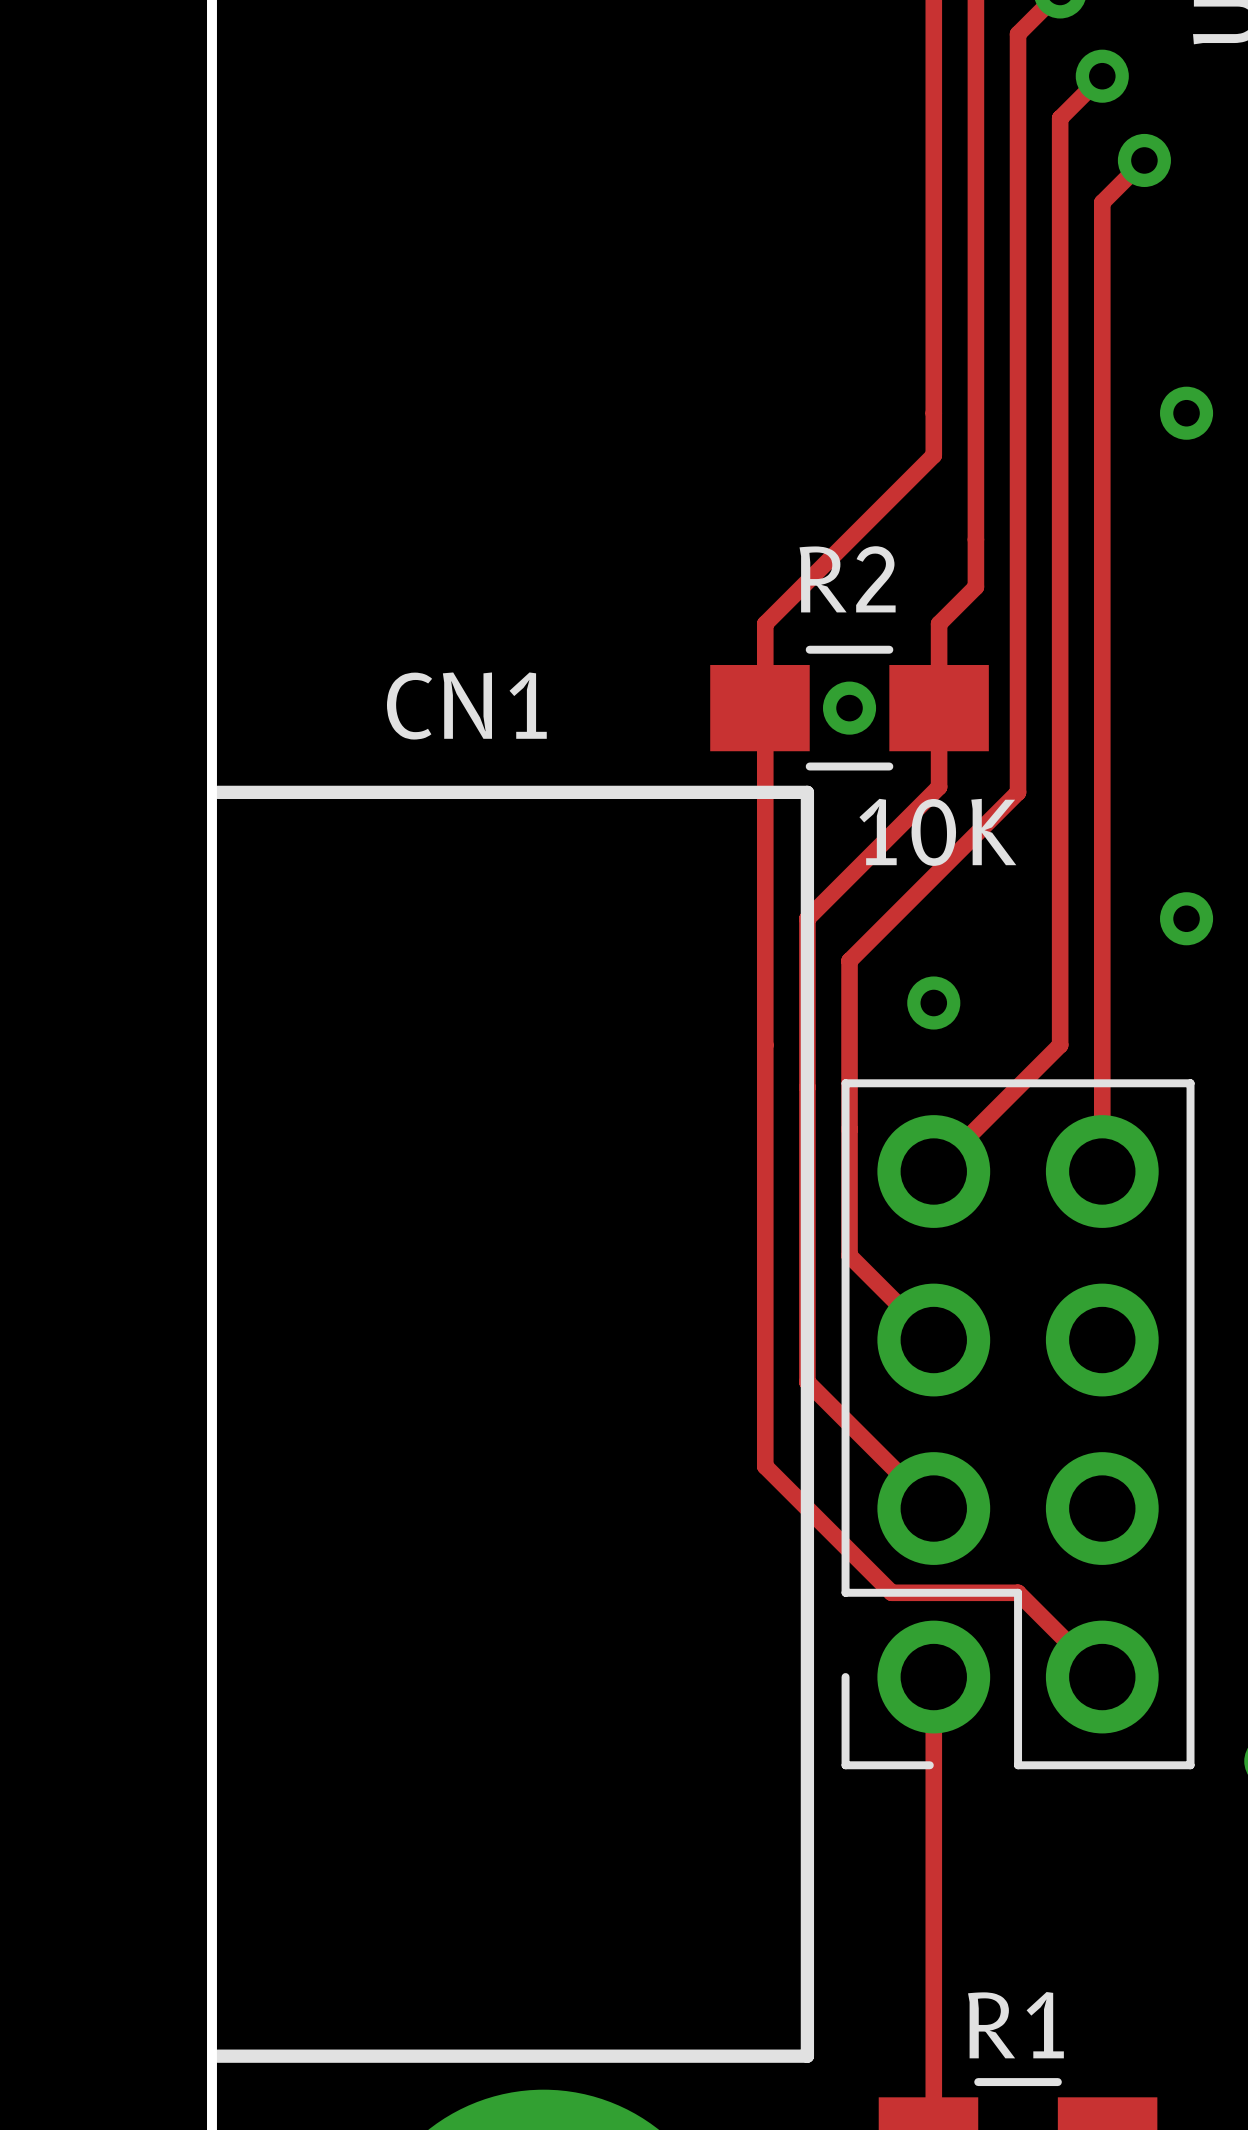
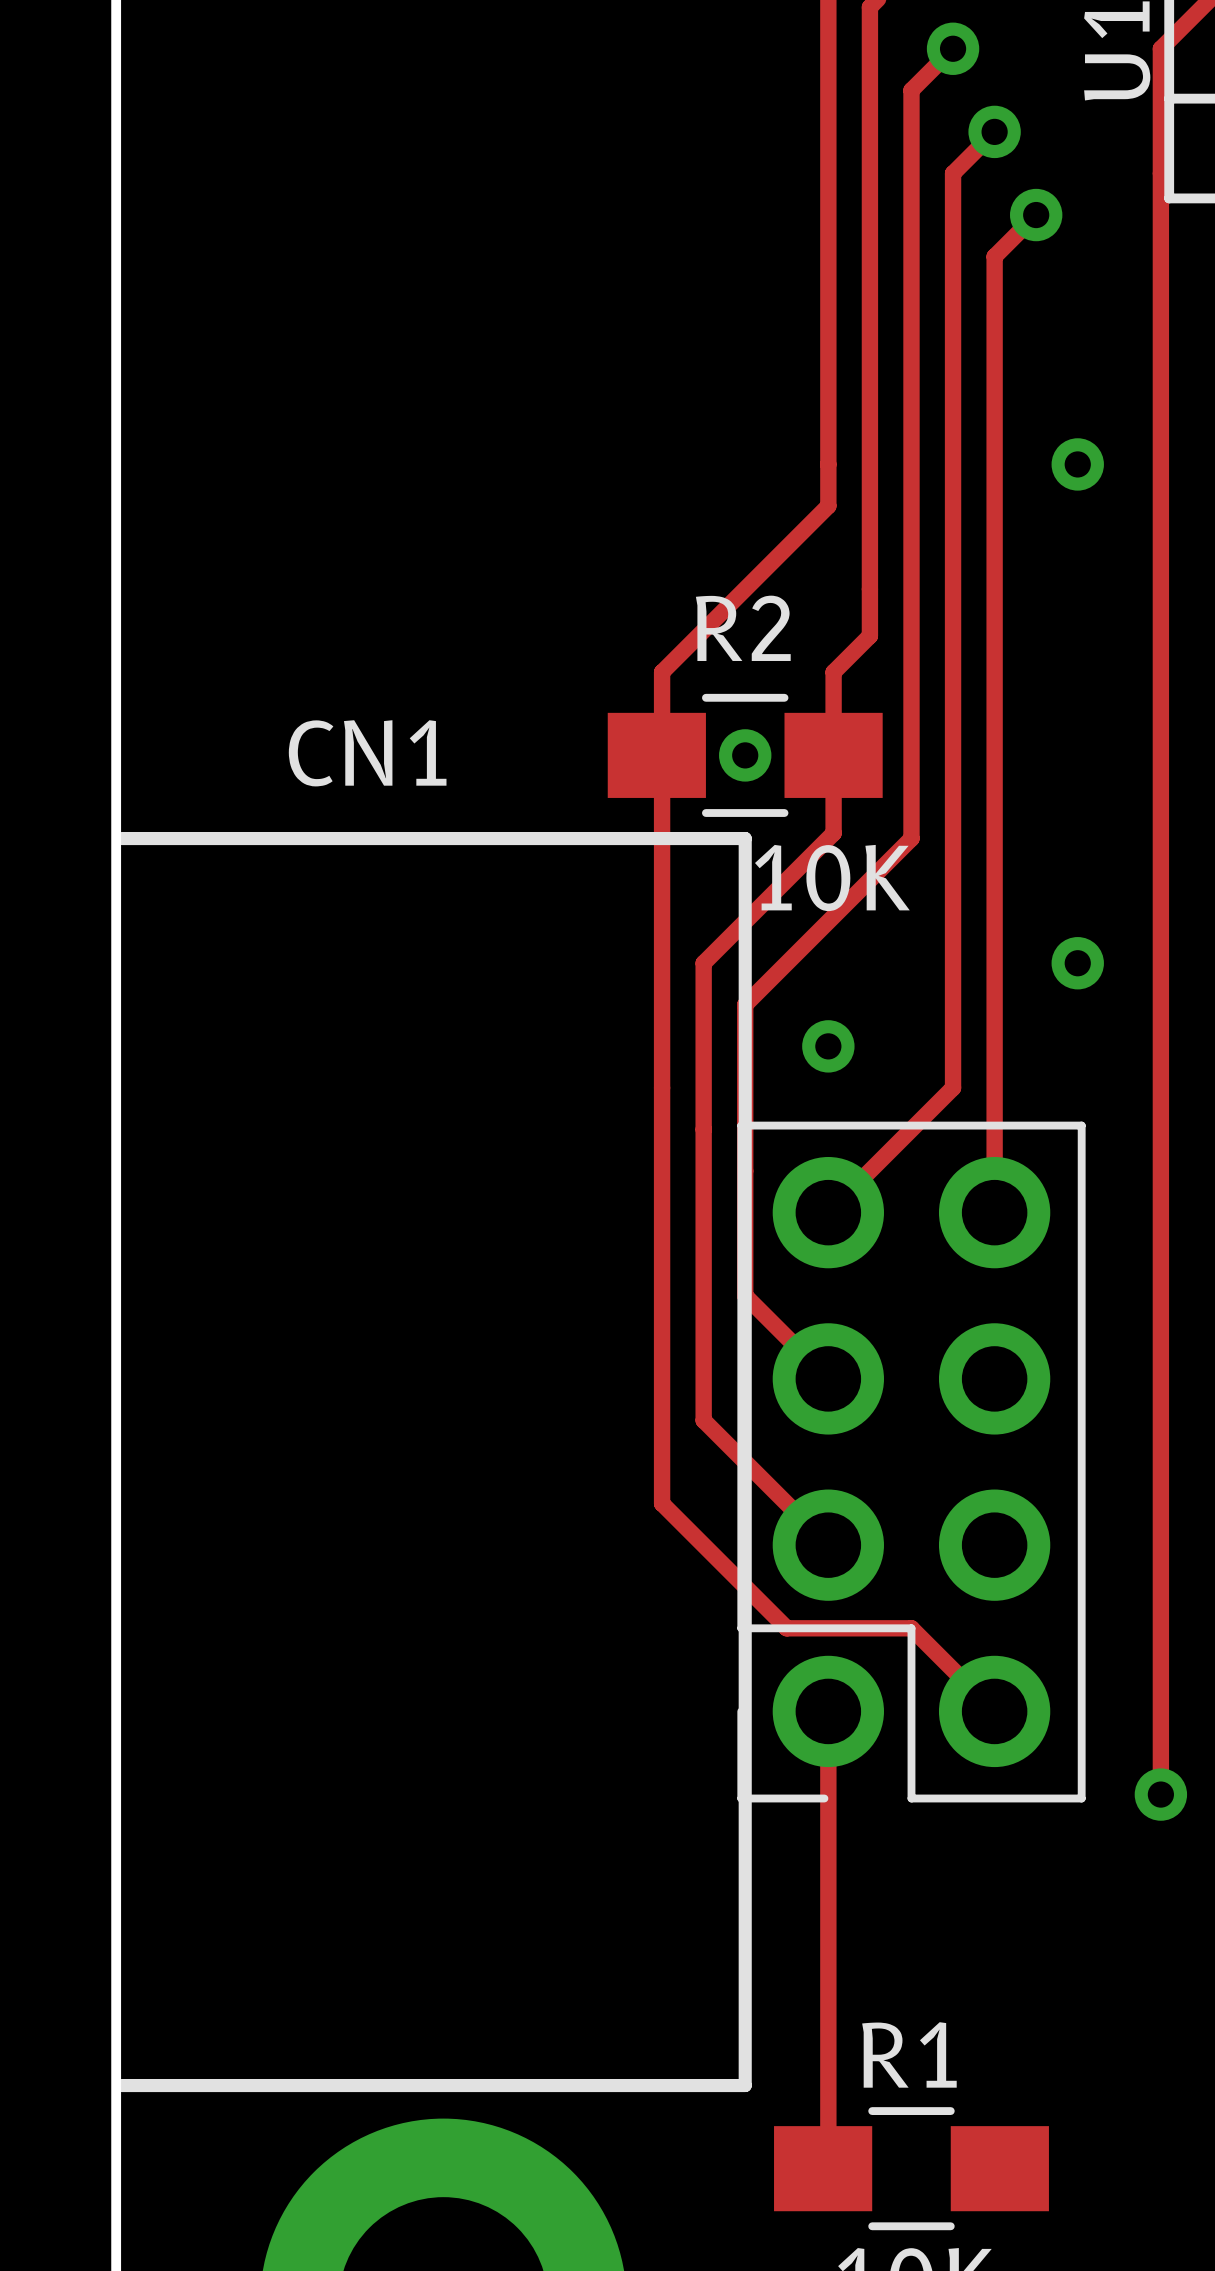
line: (807, 792) (807, 2056) -> (703, 838) (745, 838) (745, 2085) (703, 2085)

